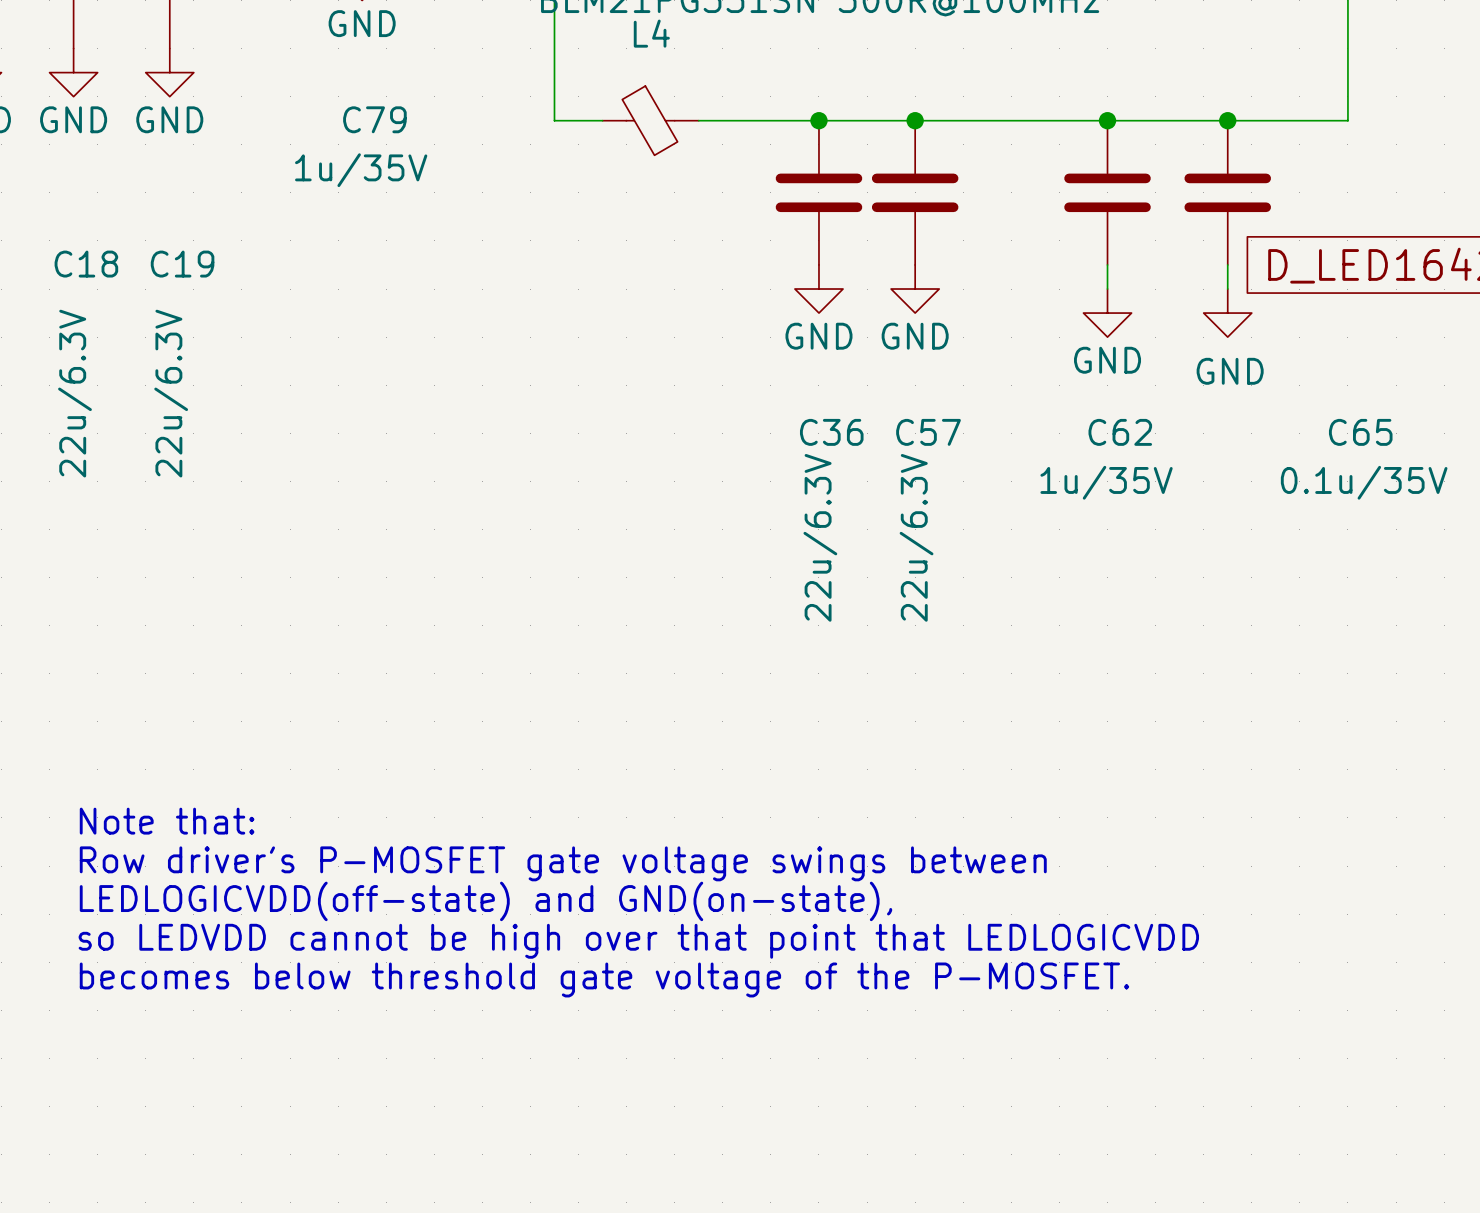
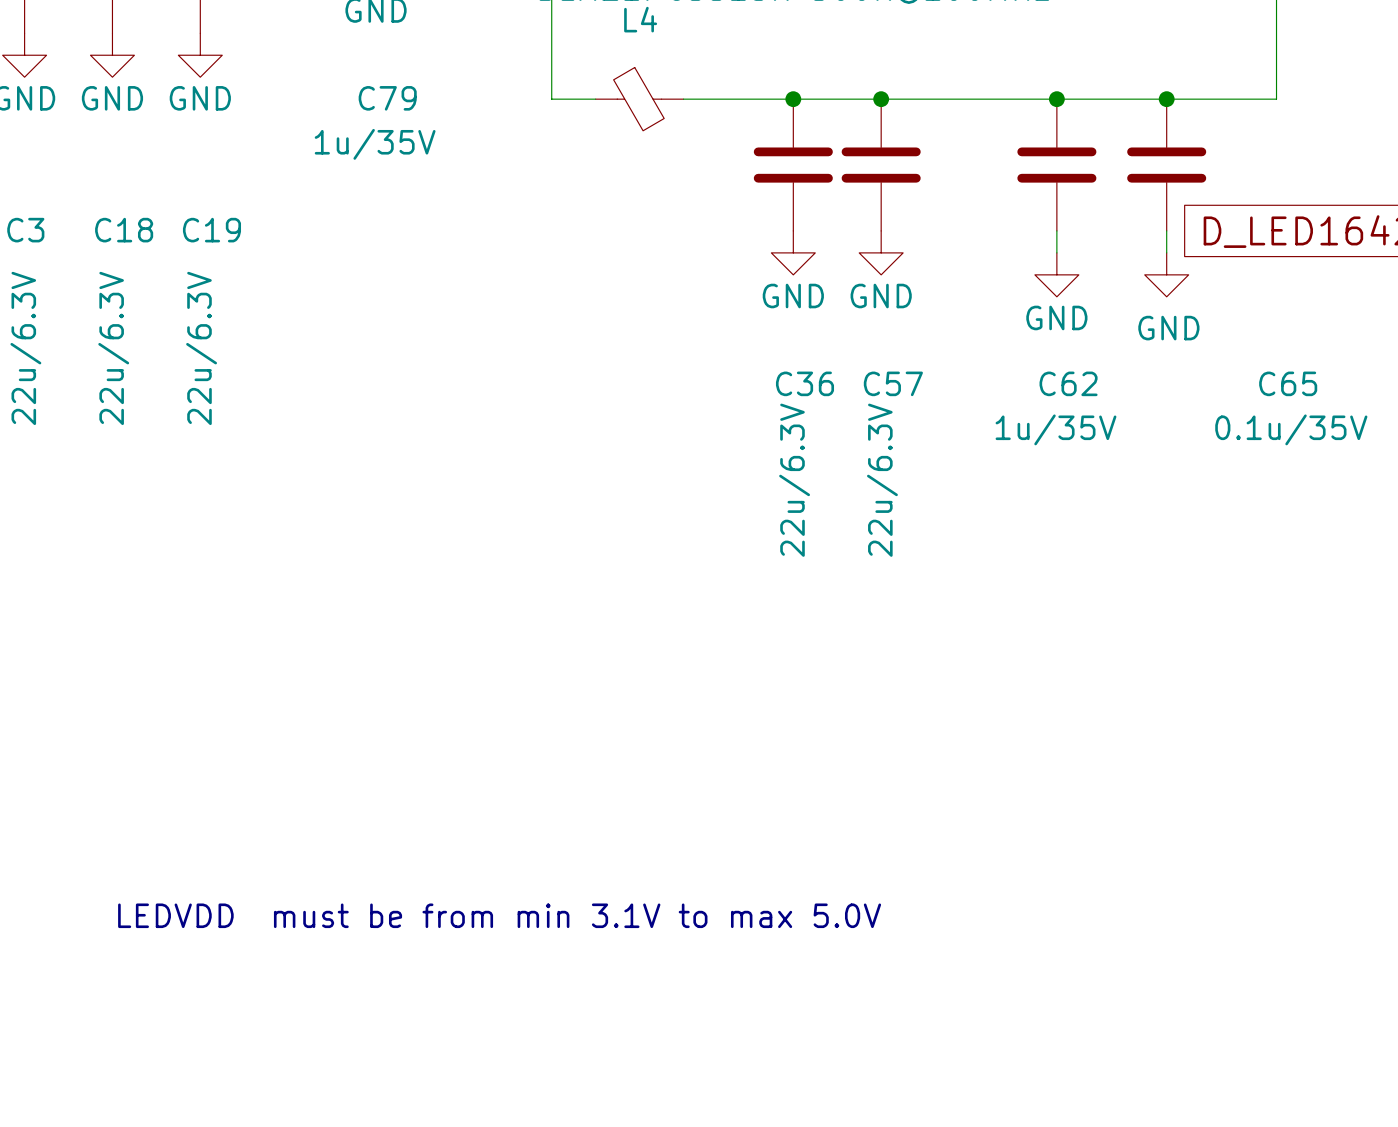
text: Note that: (167, 821) -> none
text: Row driver's P-MOSFET gate voltage swings between (563, 863) -> none
text: LEDLOGICVDD(off-state) and GND(on-state), (485, 901) -> none
text: so LEDVDD cannot be high over that point that LEDLOGICVDD (638, 941) -> none
text: becomes below threshold gate voltage of the P-MOSFET. (604, 979) -> none
text: none -> LEDVDD must be from min 3.1V to max 5.0V (499, 915)

